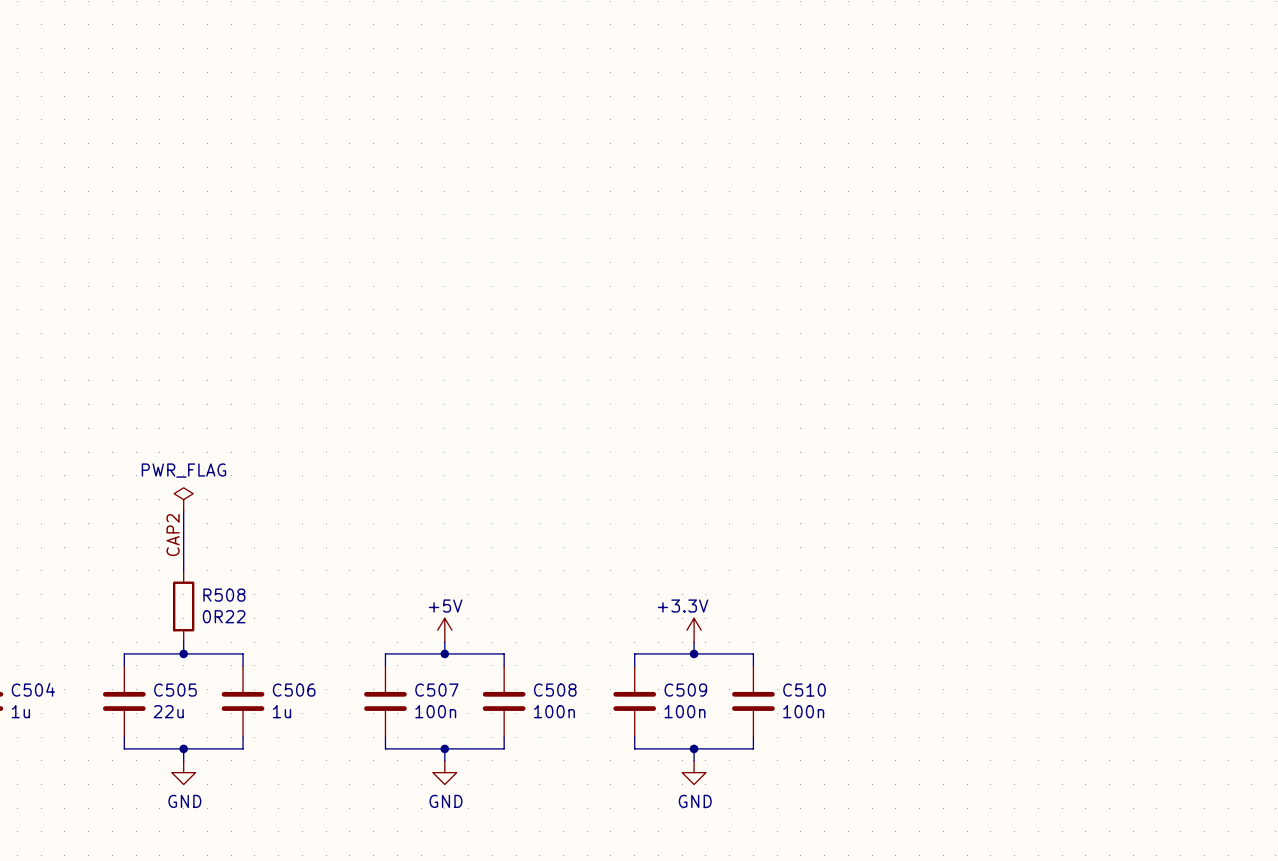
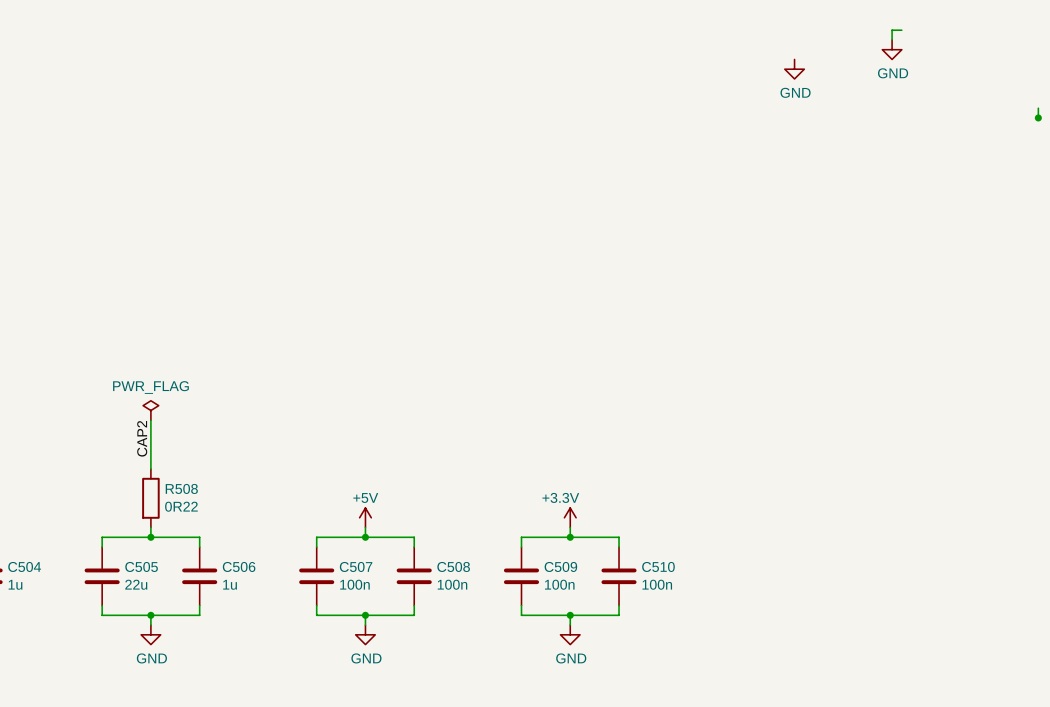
wire: none -> (901, 30) (892, 30) (892, 39)
power symbol: none -> GND (892, 49)
power symbol: none -> GND (794, 69)
wire: none -> (1038, 108) (1038, 117)
junction: none -> (1038, 117)

